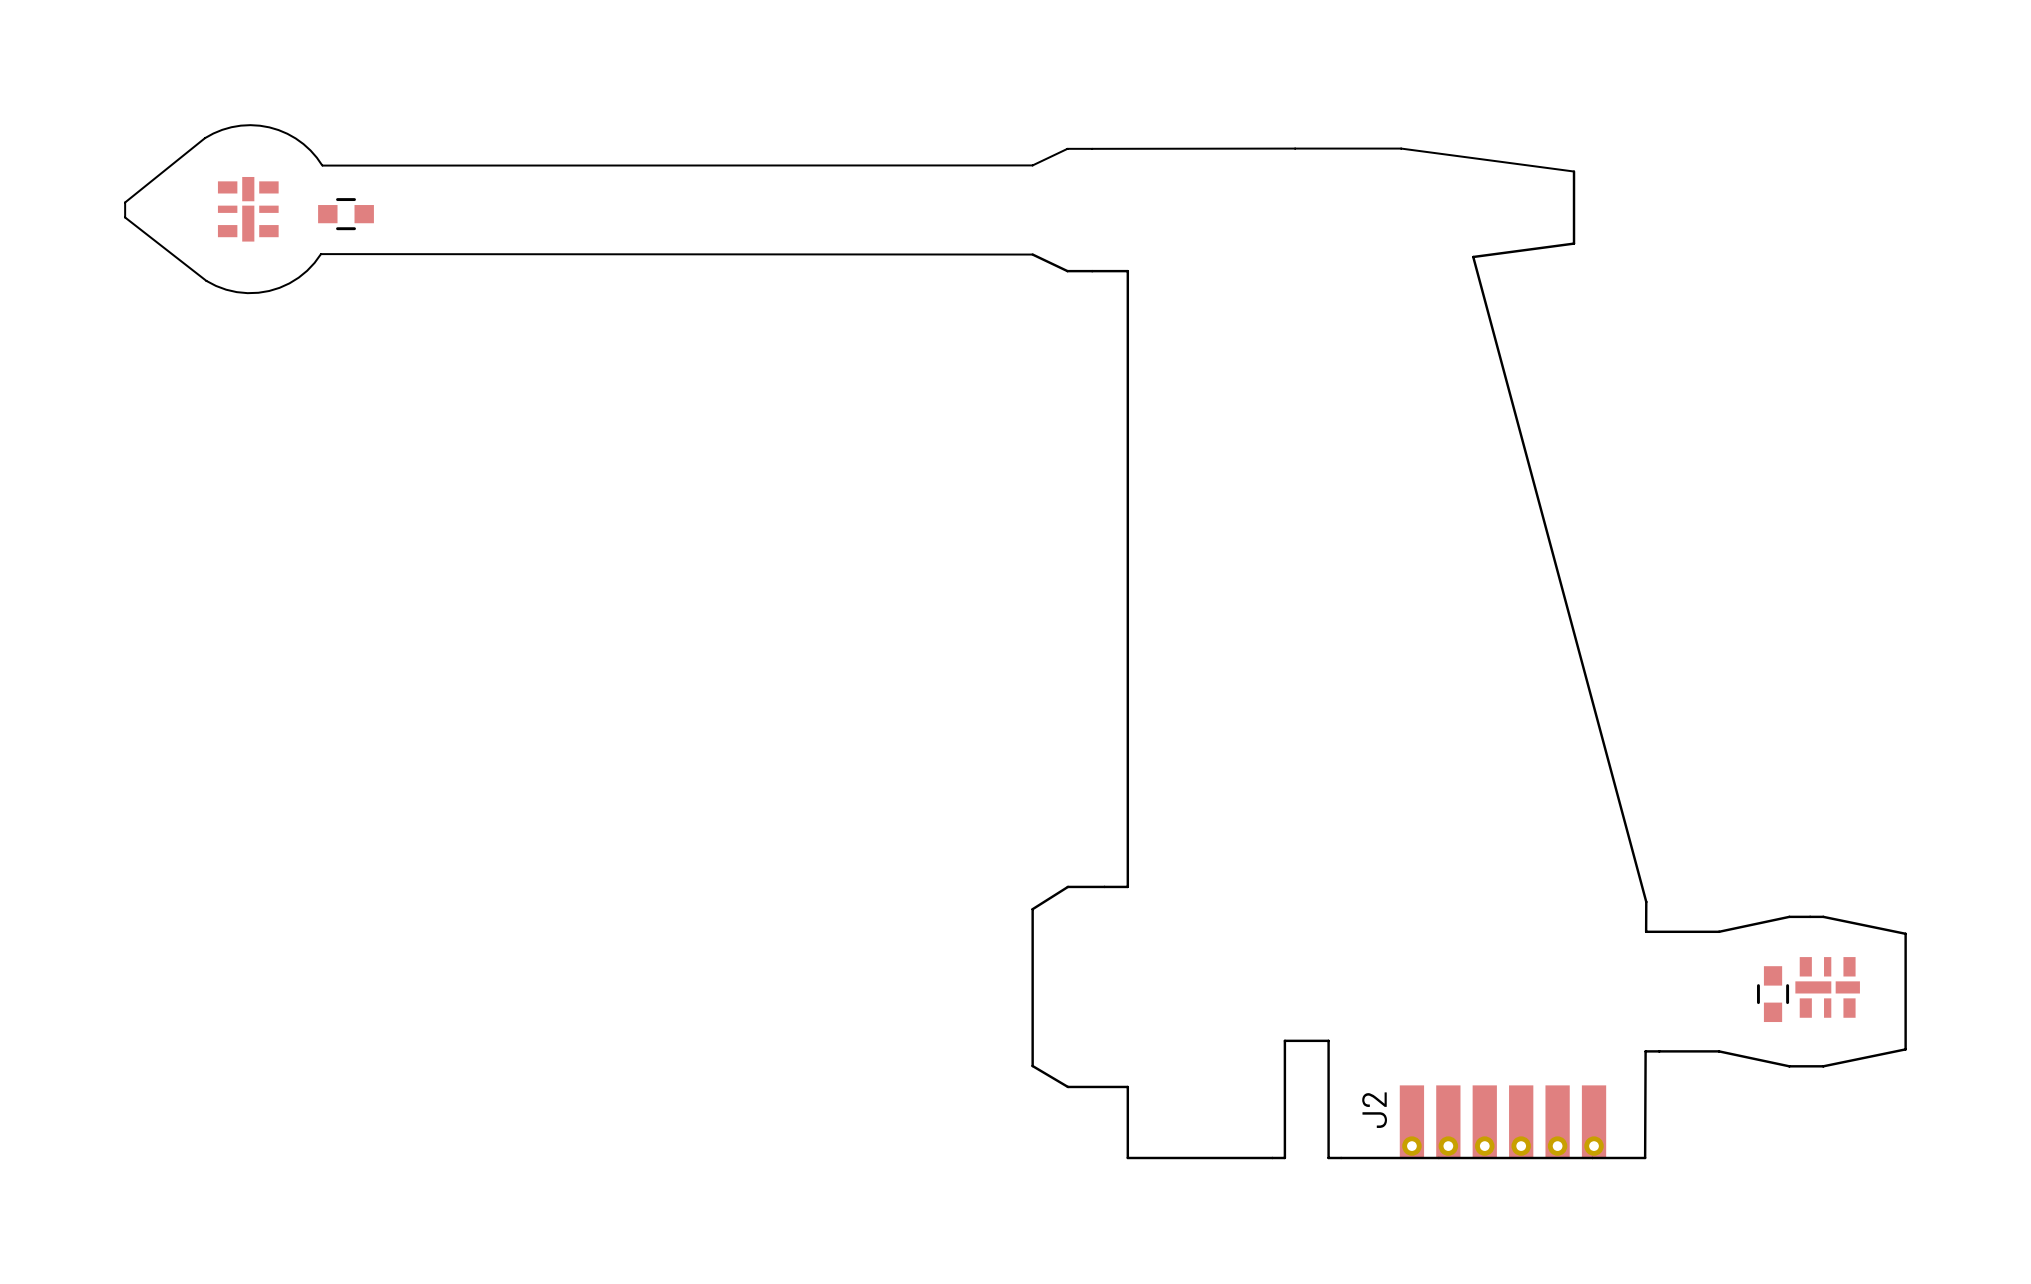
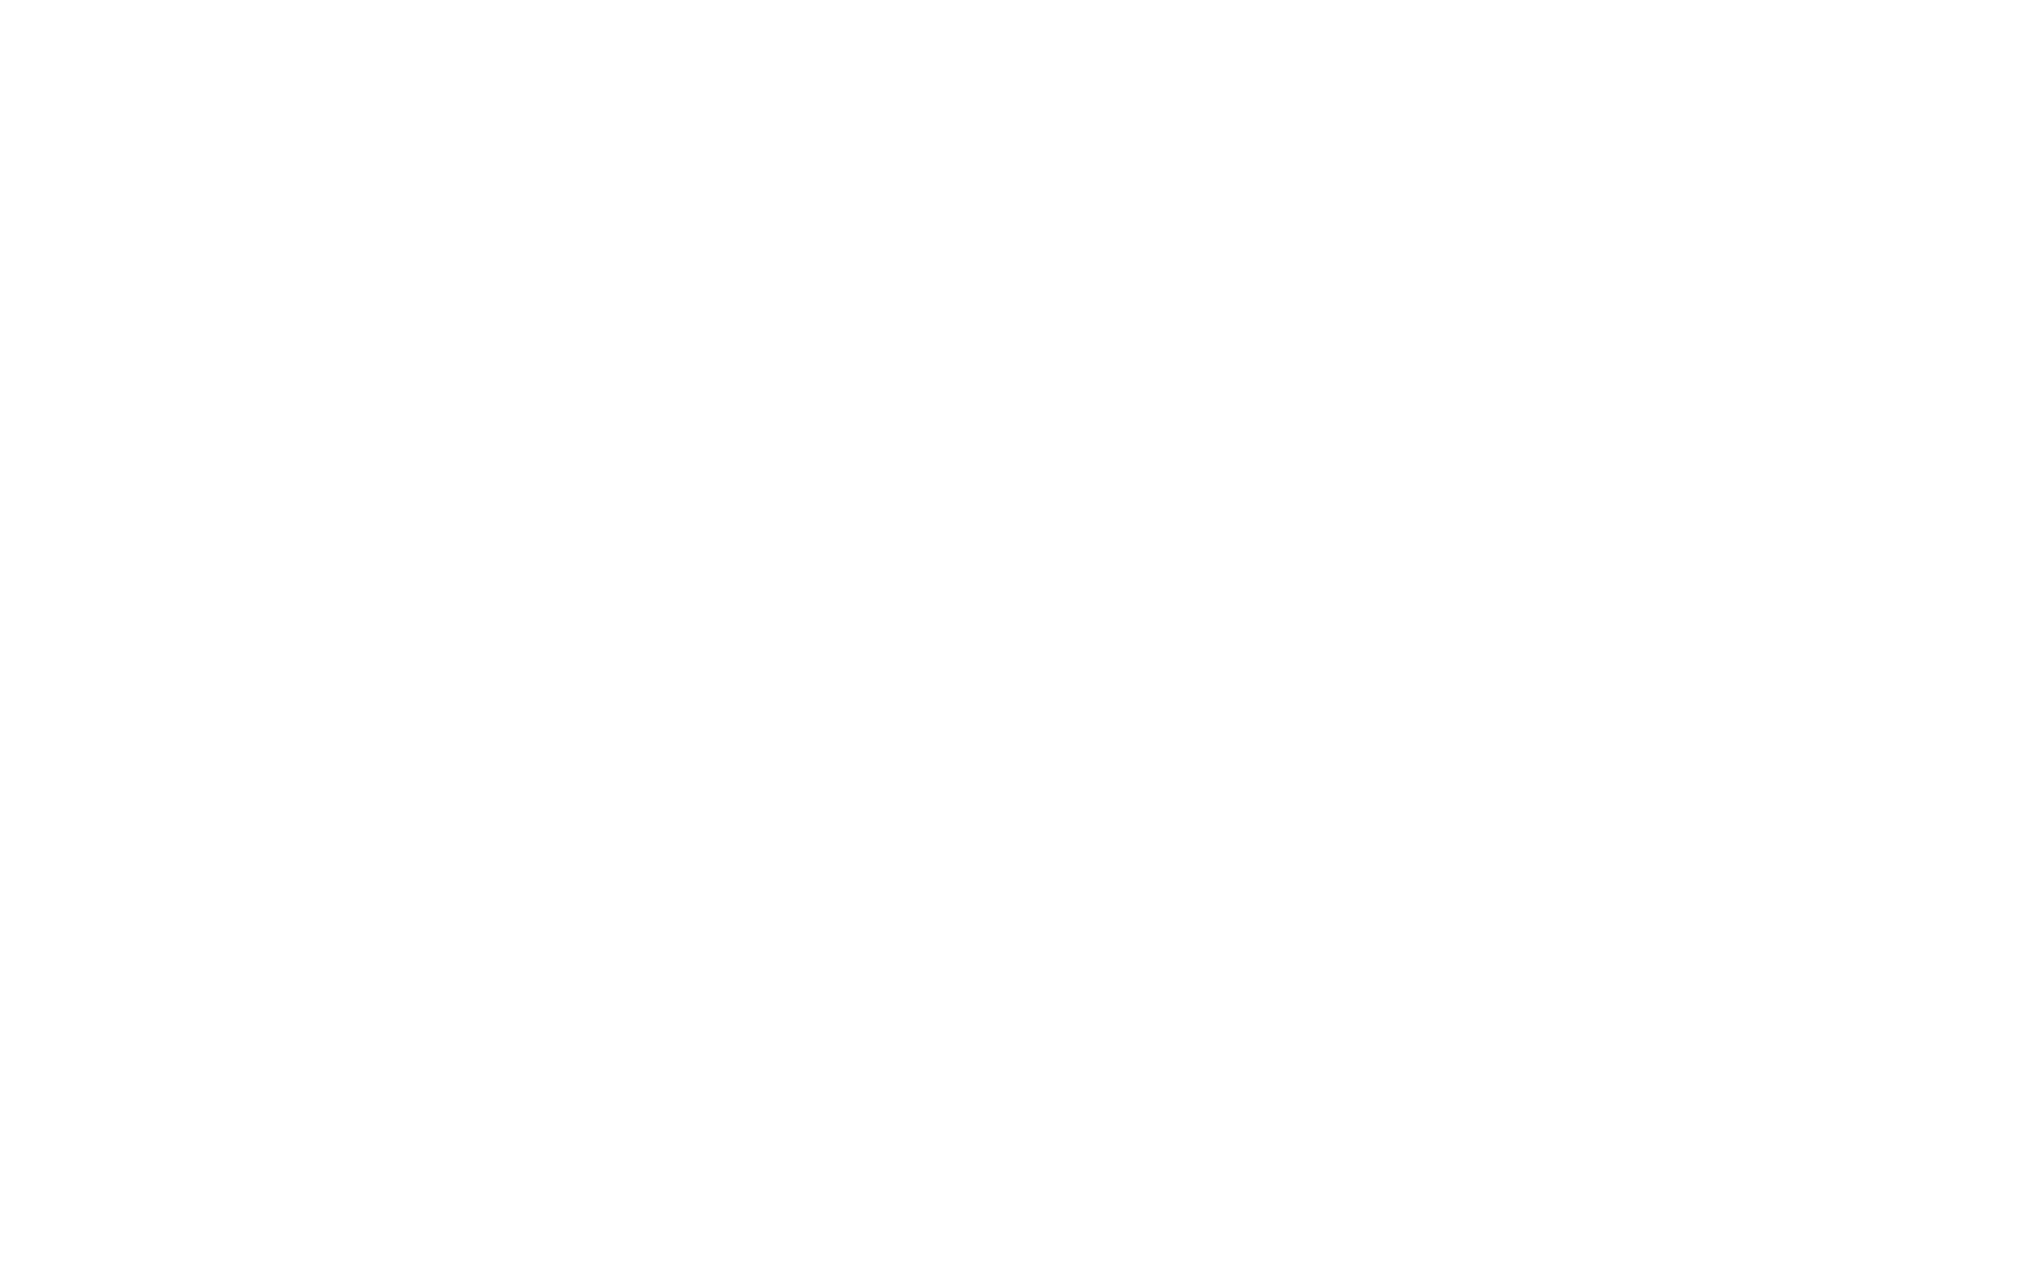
board edge: (322, 165) (310, 150) (287, 133) (259, 125) (231, 127) (205, 138) (125, 202) (125, 217) (206, 280) (226, 289) (247, 293) (269, 290) (289, 283) (307, 270) (320, 254) (1032, 254) (1067, 271) (1127, 271) (1127, 886) (1067, 886) (1032, 909) (1032, 1066) (1067, 1086) (1127, 1086) (1127, 1157) (1284, 1157) (1284, 1040) (1328, 1040) (1328, 1157) (1645, 1157) (1645, 1051) (1719, 1051) (1789, 1066) (1823, 1066) (1905, 1049) (1905, 933) (1823, 916) (1789, 916) (1719, 931) (1646, 931) (1646, 901) (1473, 256) (1574, 243) (1574, 171) (1401, 148) (1067, 148) (1032, 165) (322, 165) -> none
part: (248, 209) -> none
part: (346, 214) -> none
part: (1827, 987) -> none
part: (1773, 994) -> none
J2: (1502, 1121) -> none

